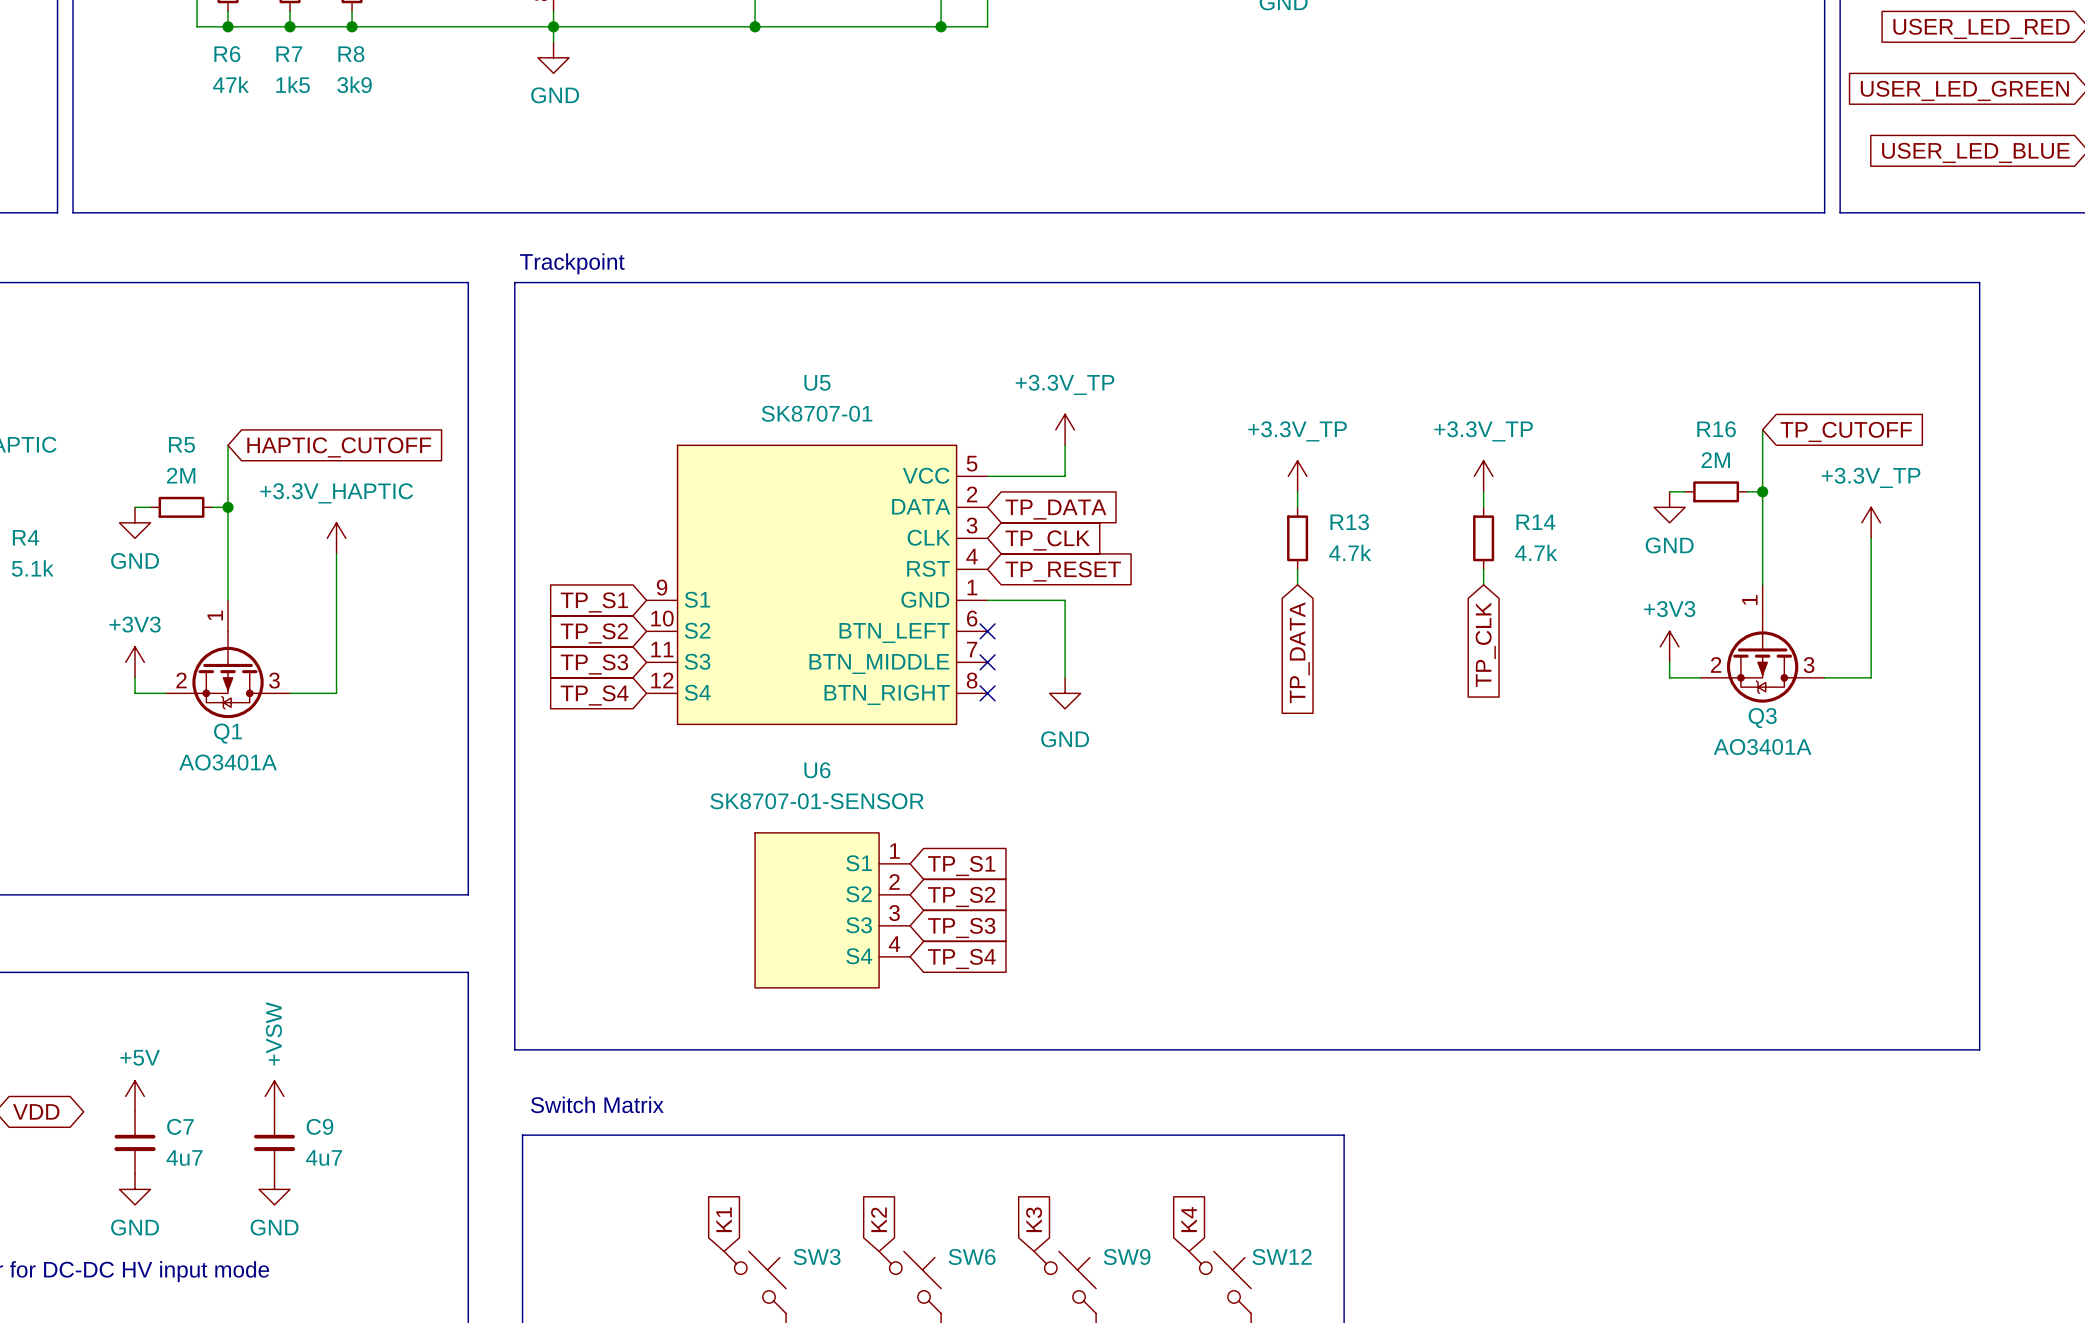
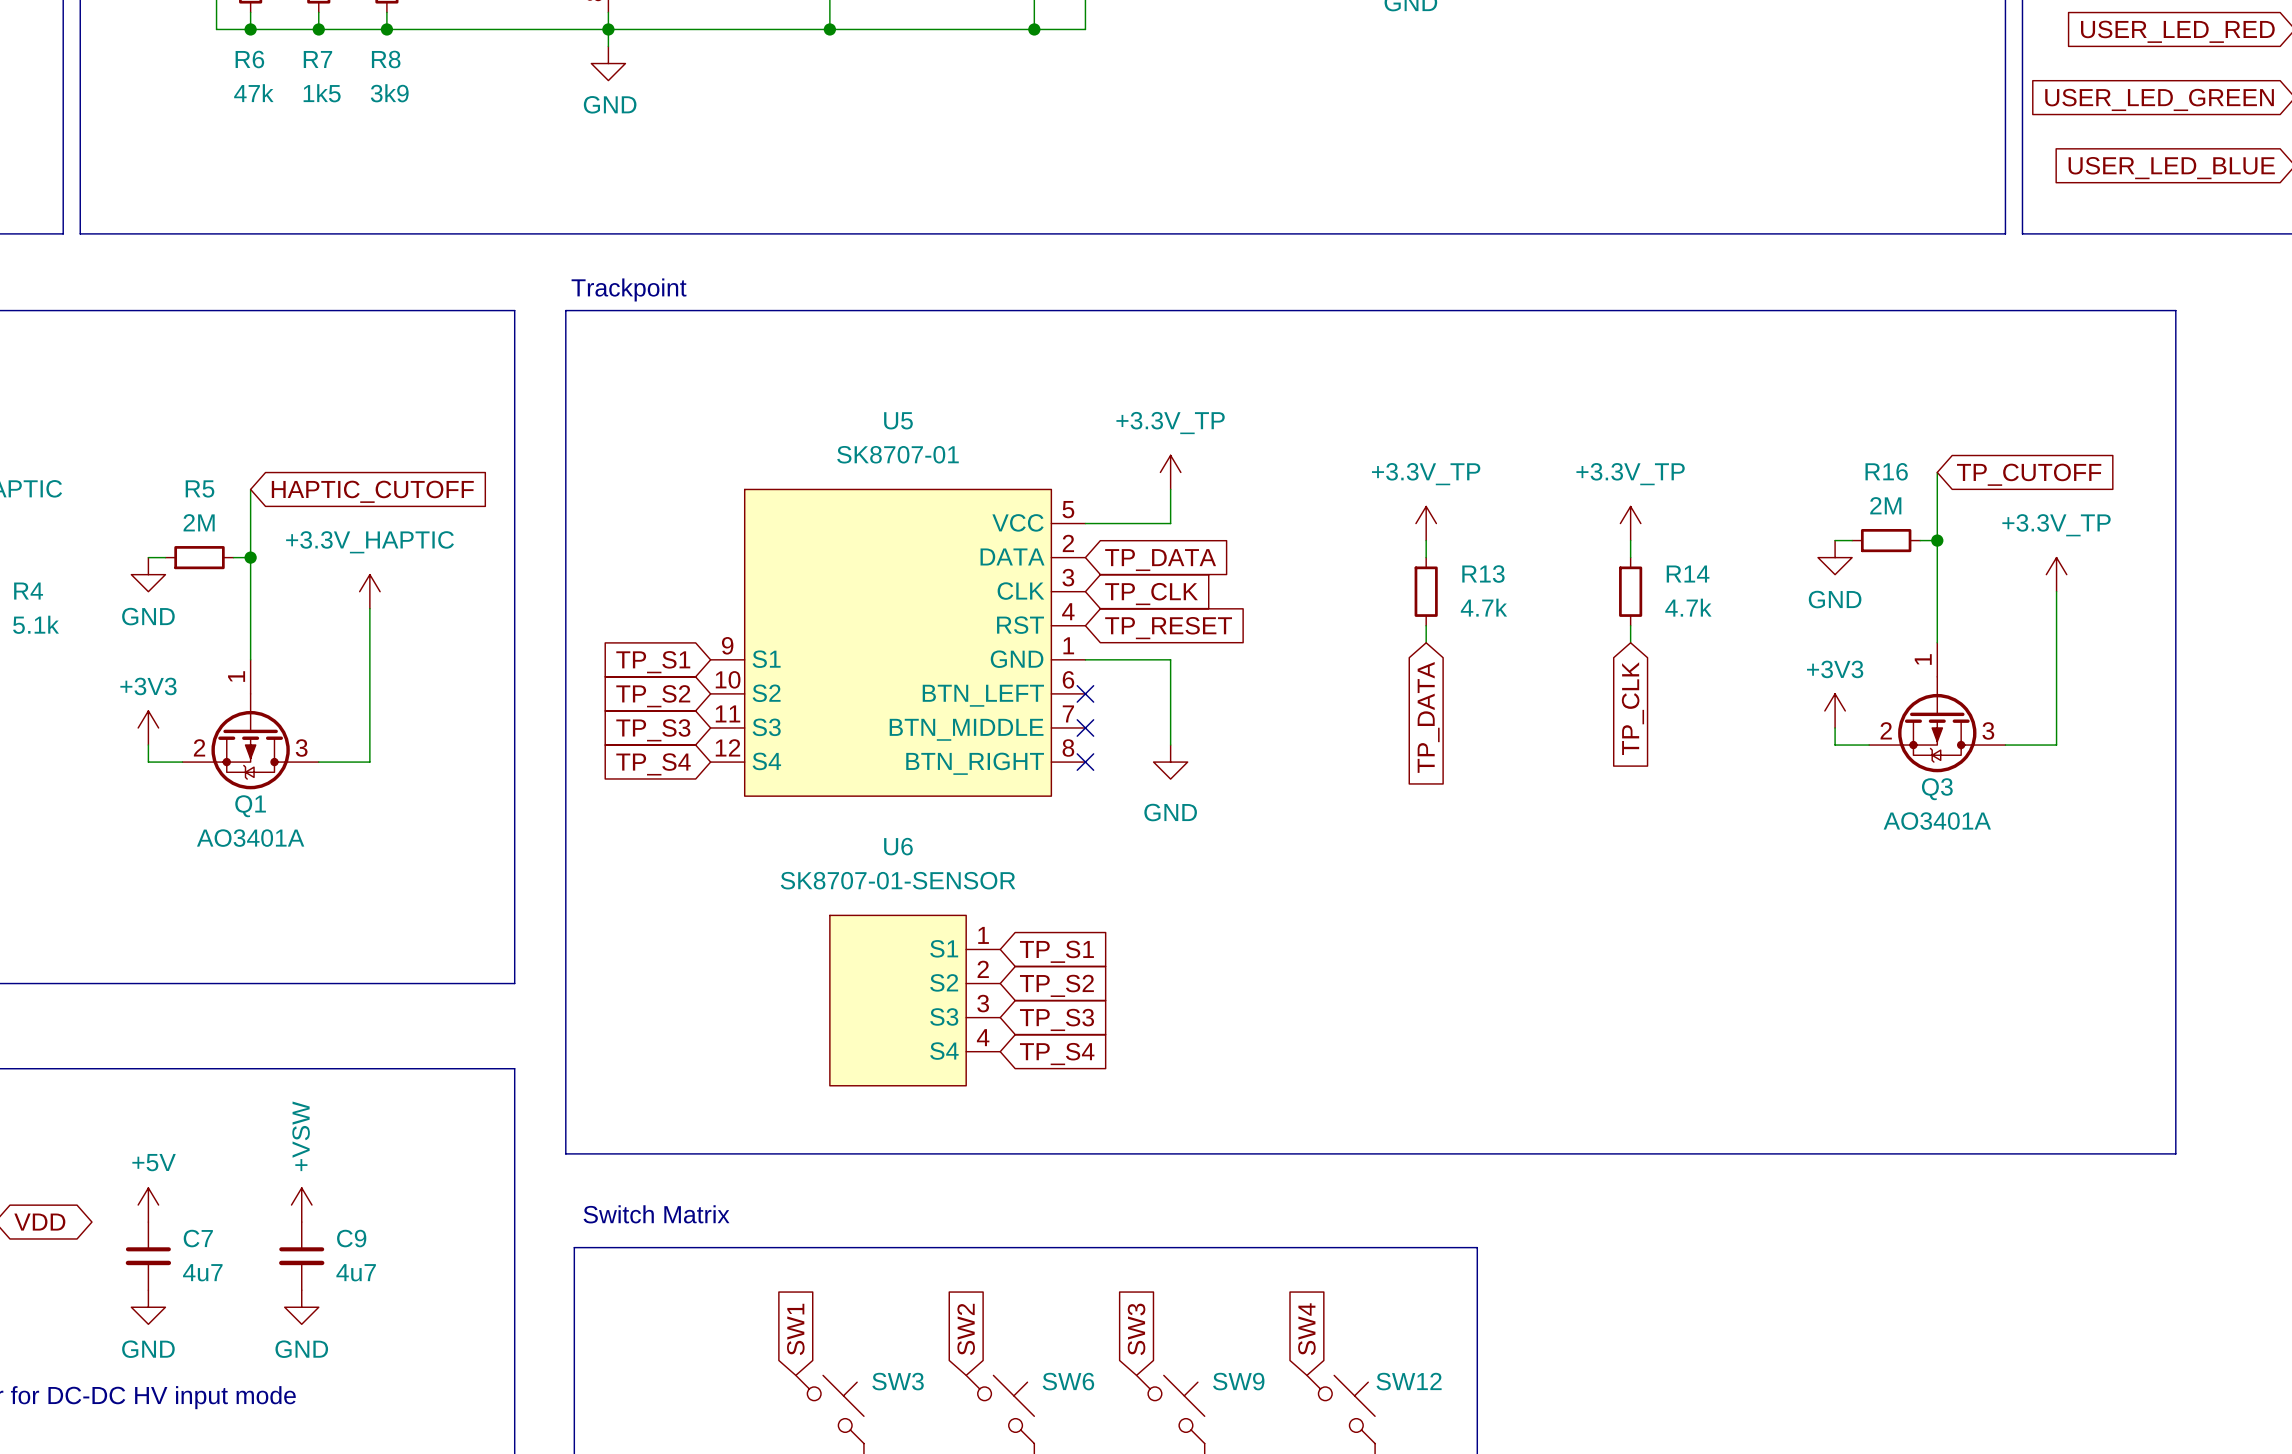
global label: K1 (724, 1219) -> SW1 (795, 1329)
global label: K2 (878, 1219) -> SW2 (966, 1329)
global label: K3 (1034, 1219) -> SW3 (1136, 1329)
global label: K4 (1189, 1219) -> SW4 (1306, 1329)

